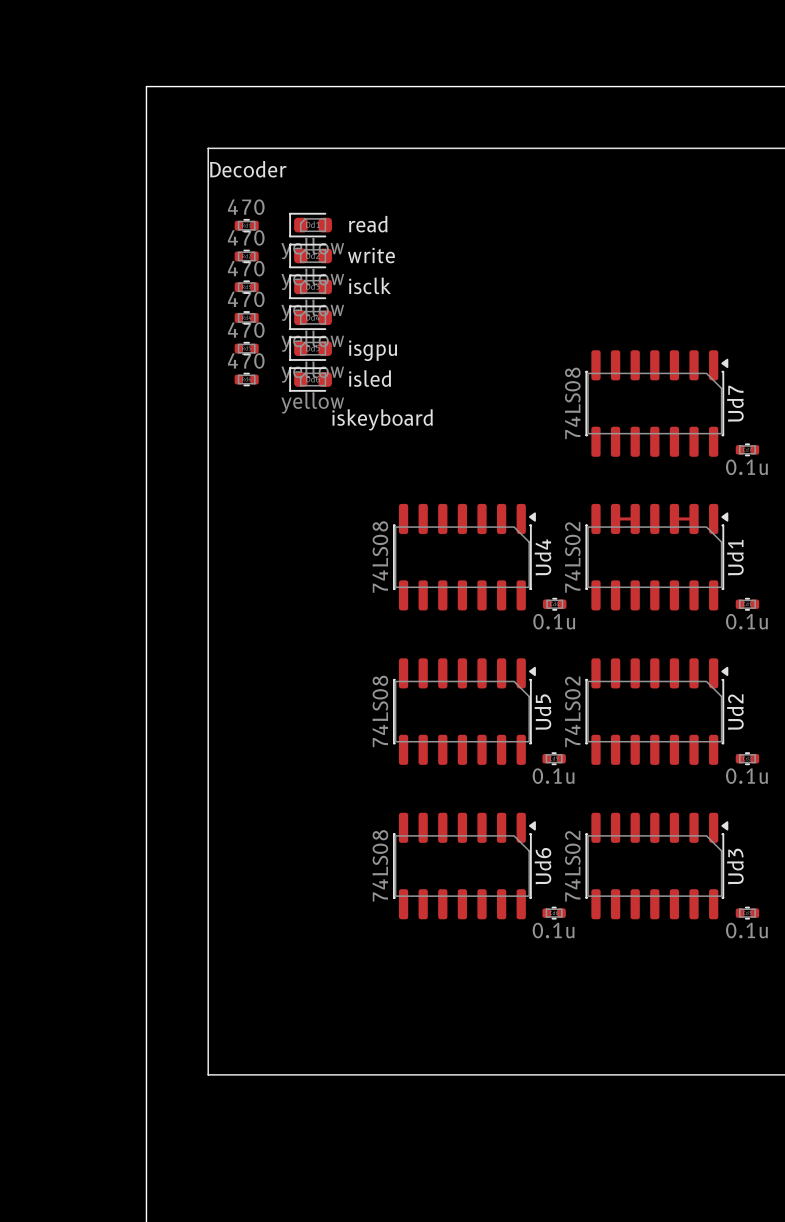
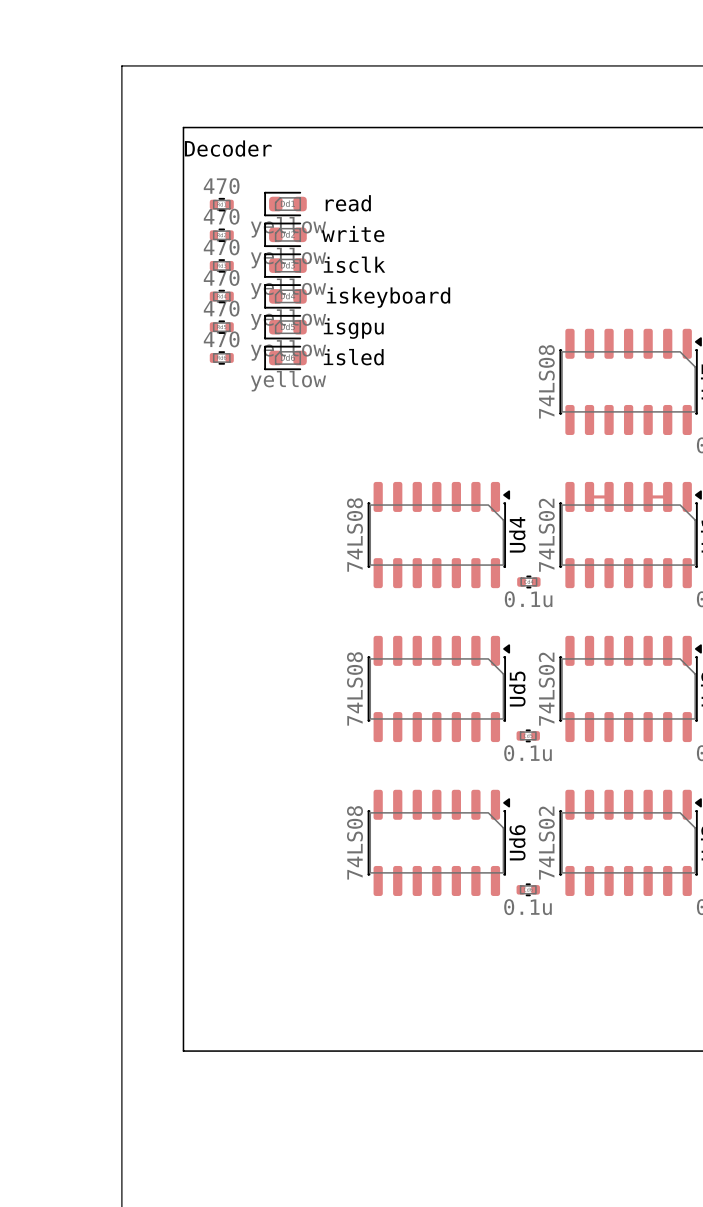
text position: iskeyboard (382, 419) -> iskeyboard (388, 297)

